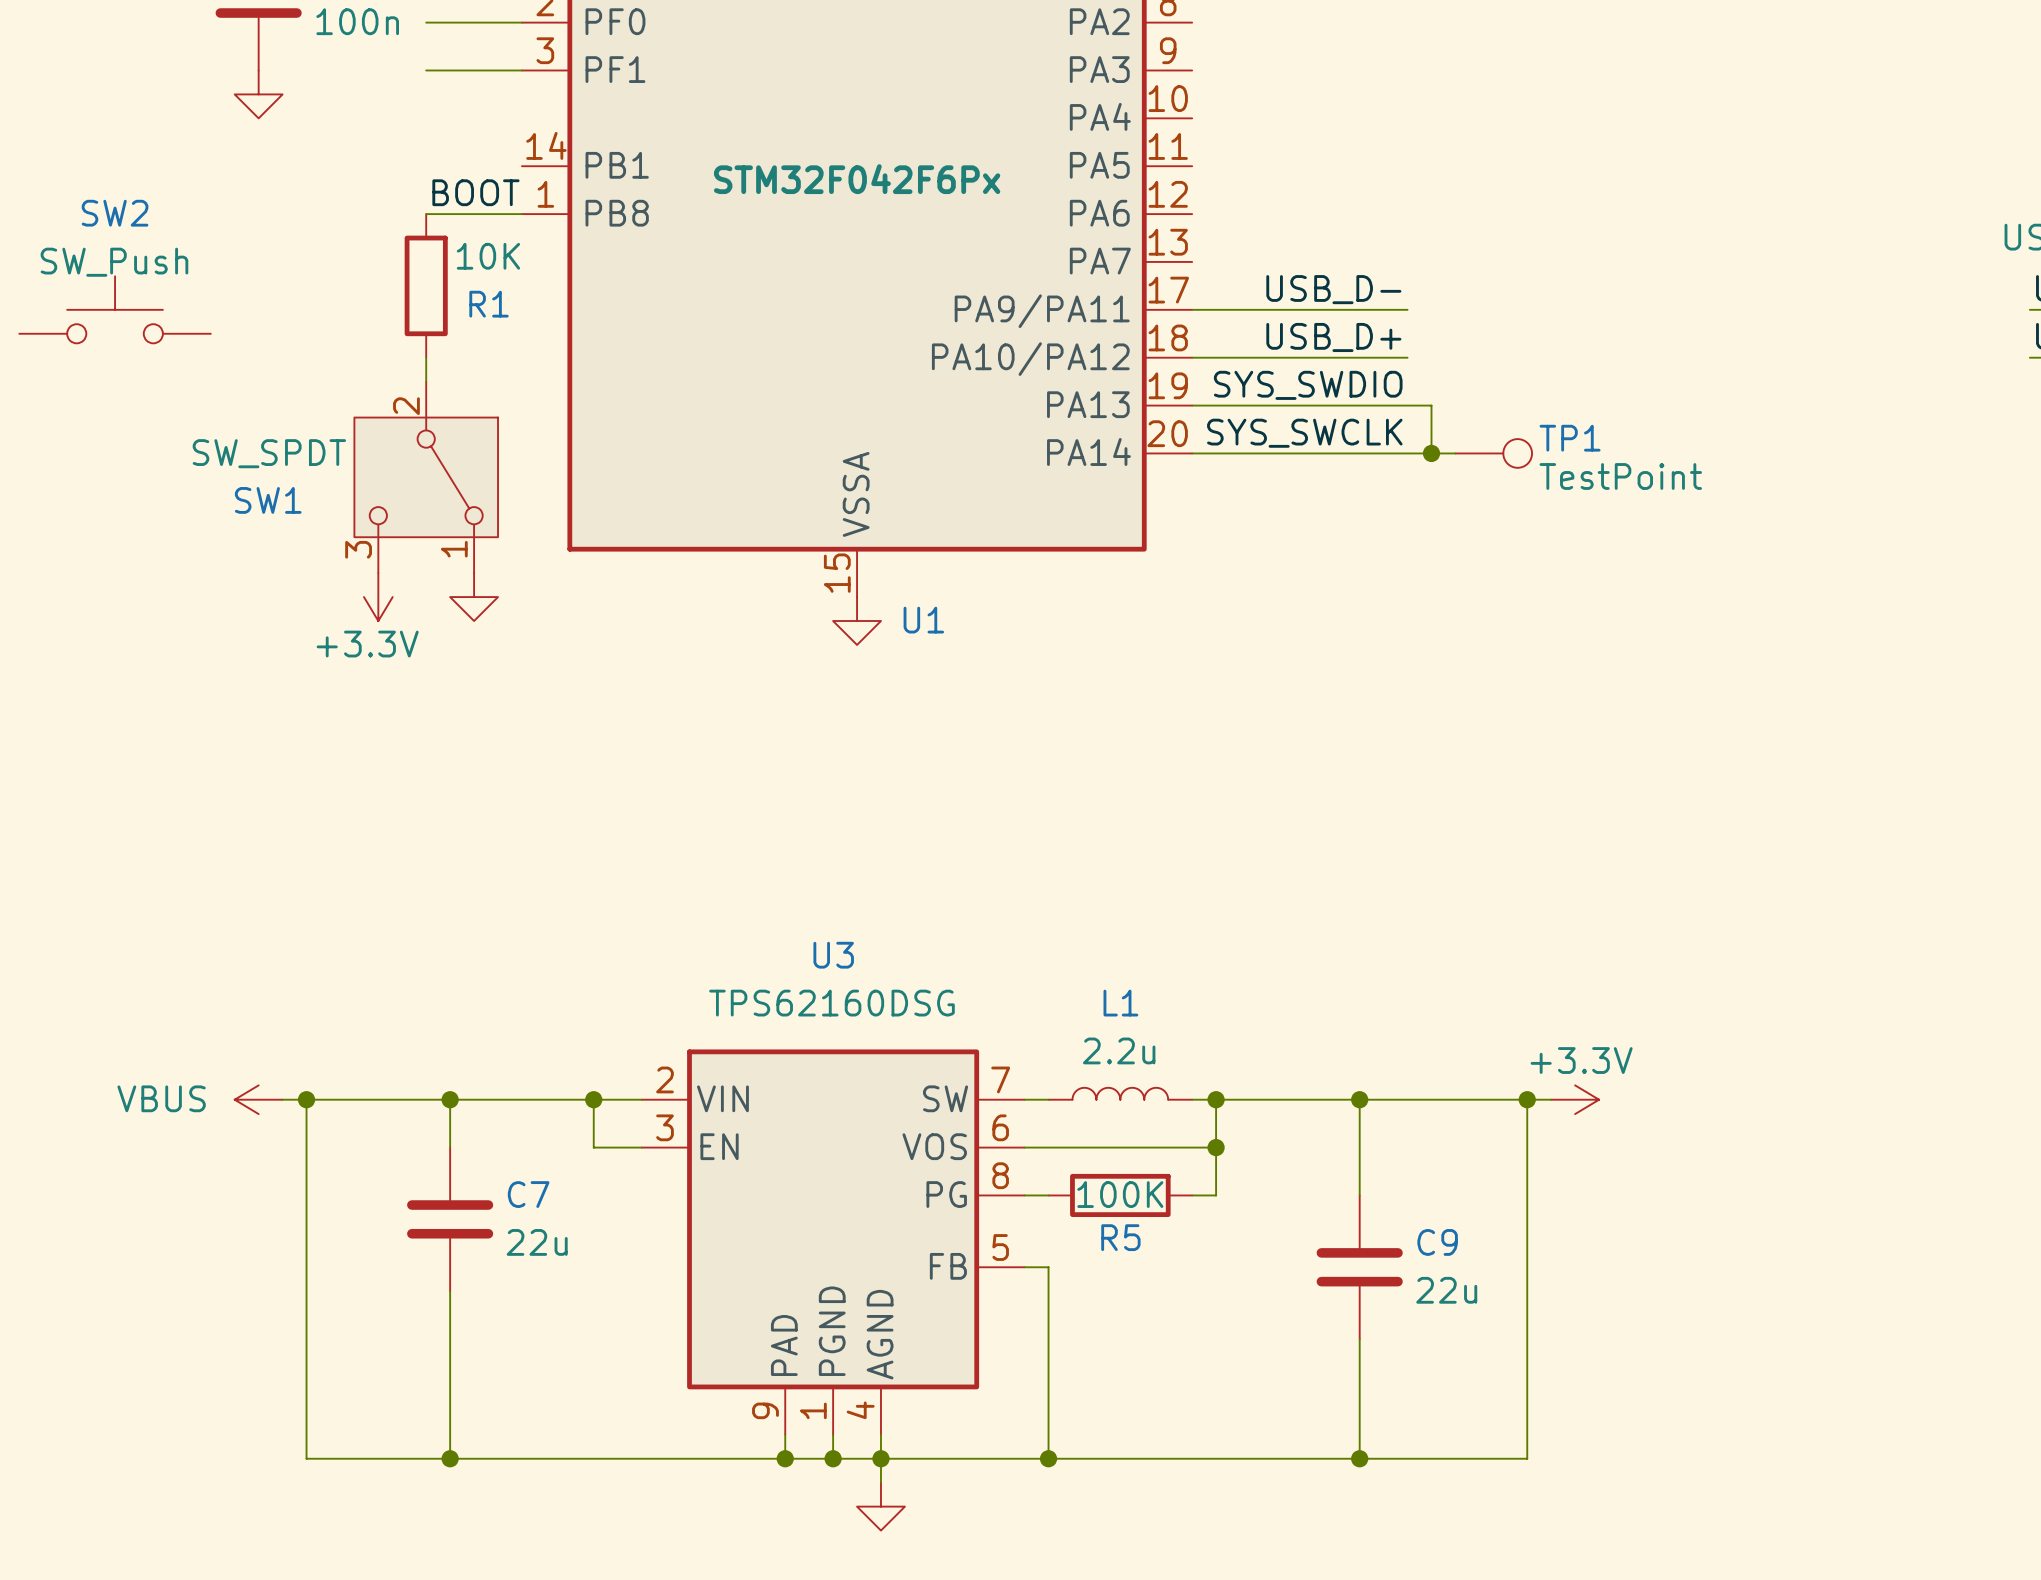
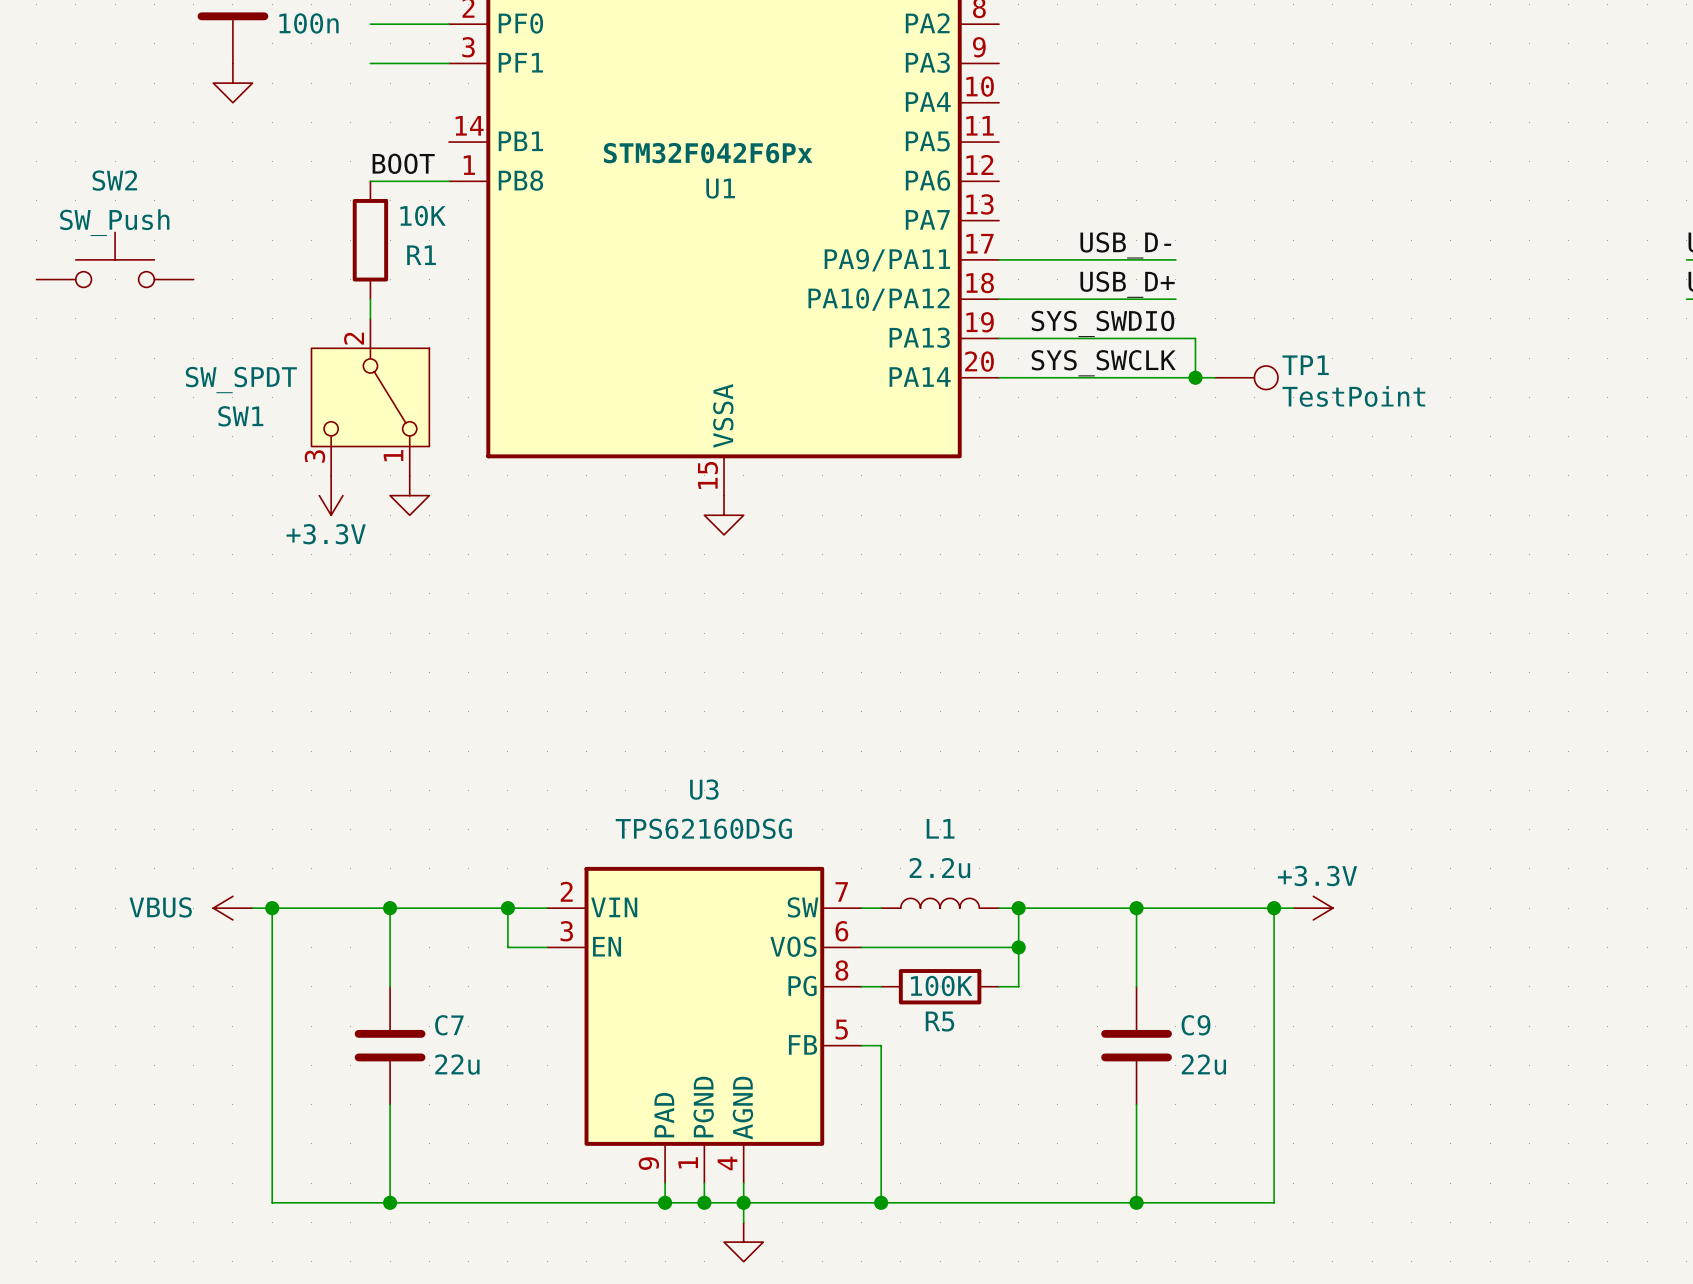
U1 name position: U1 (923, 620) -> U1 (720, 188)
C7 position: (450, 1219) -> (390, 1045)

